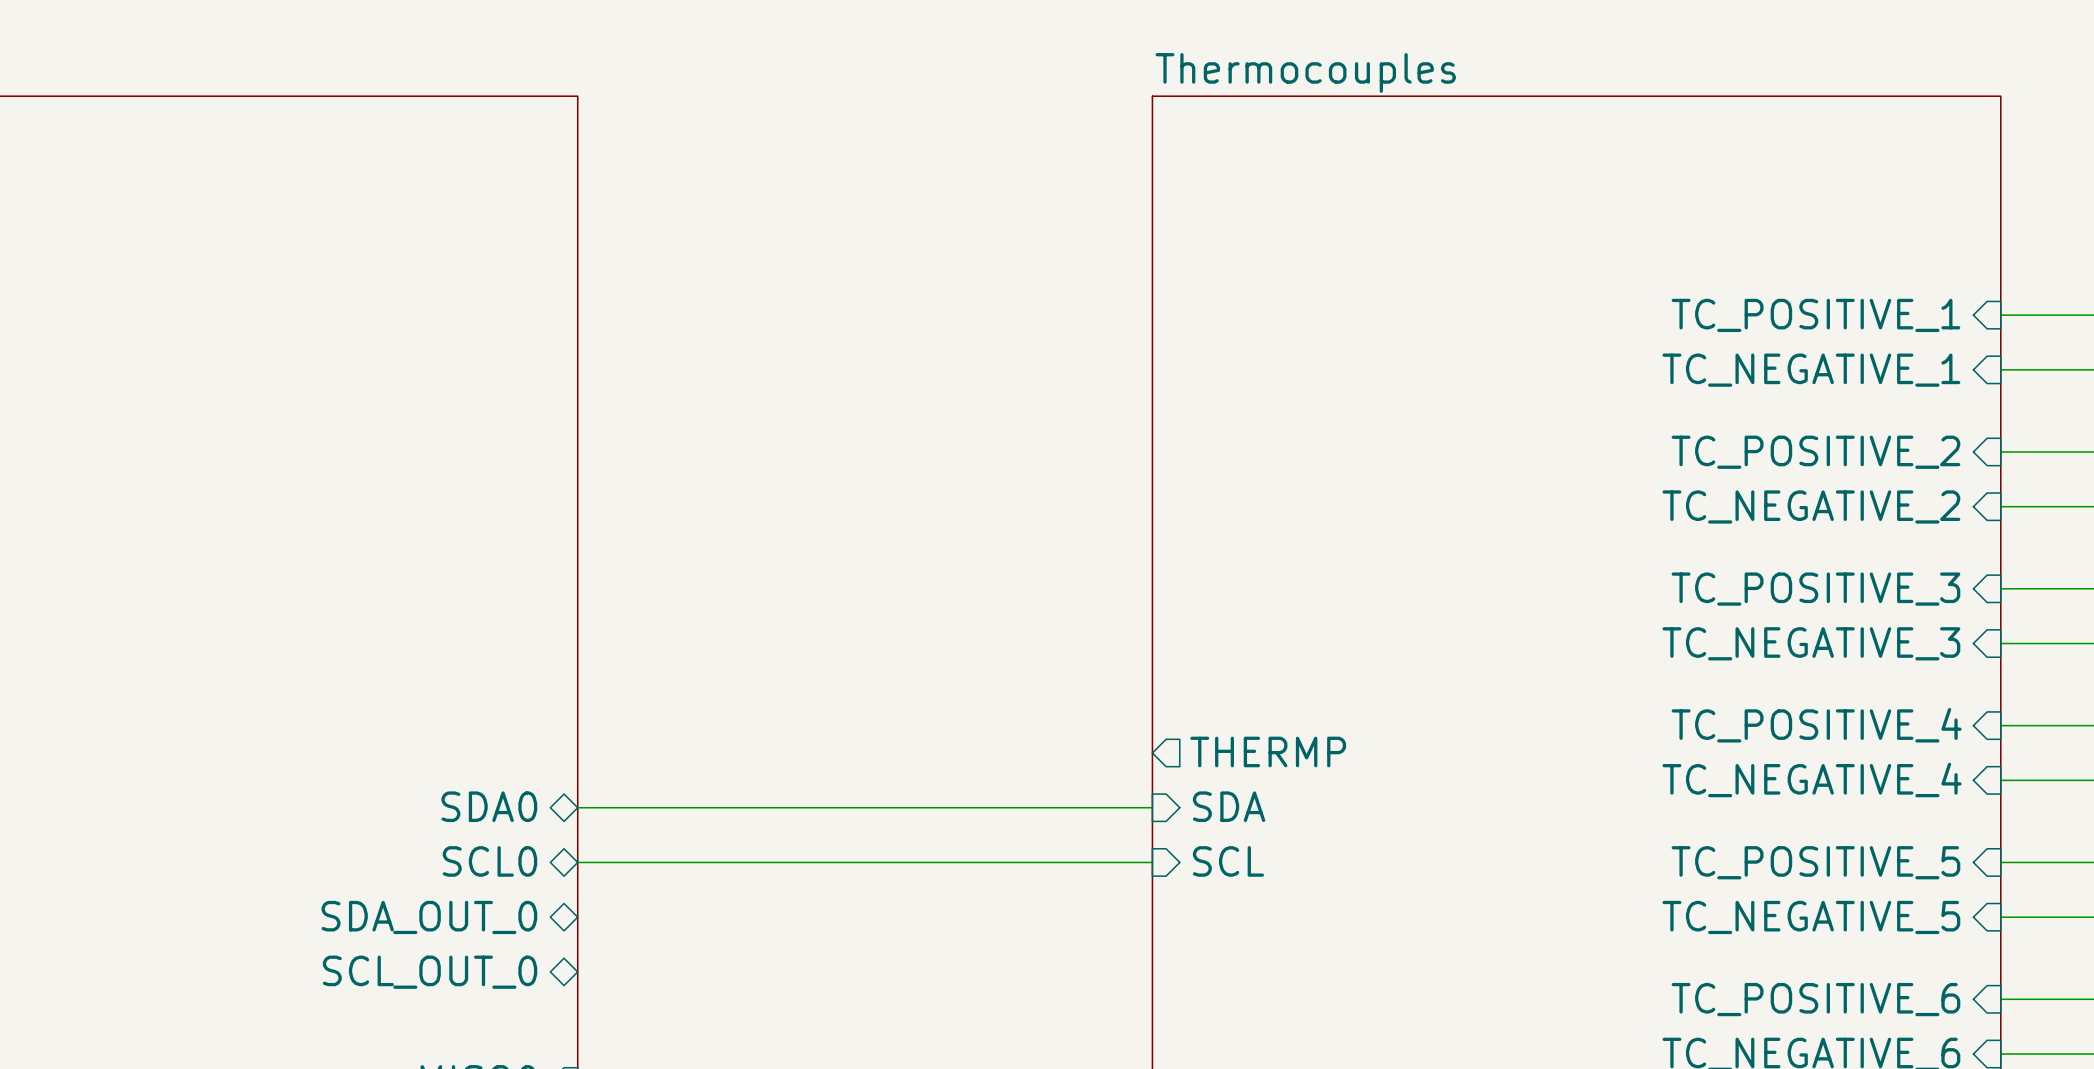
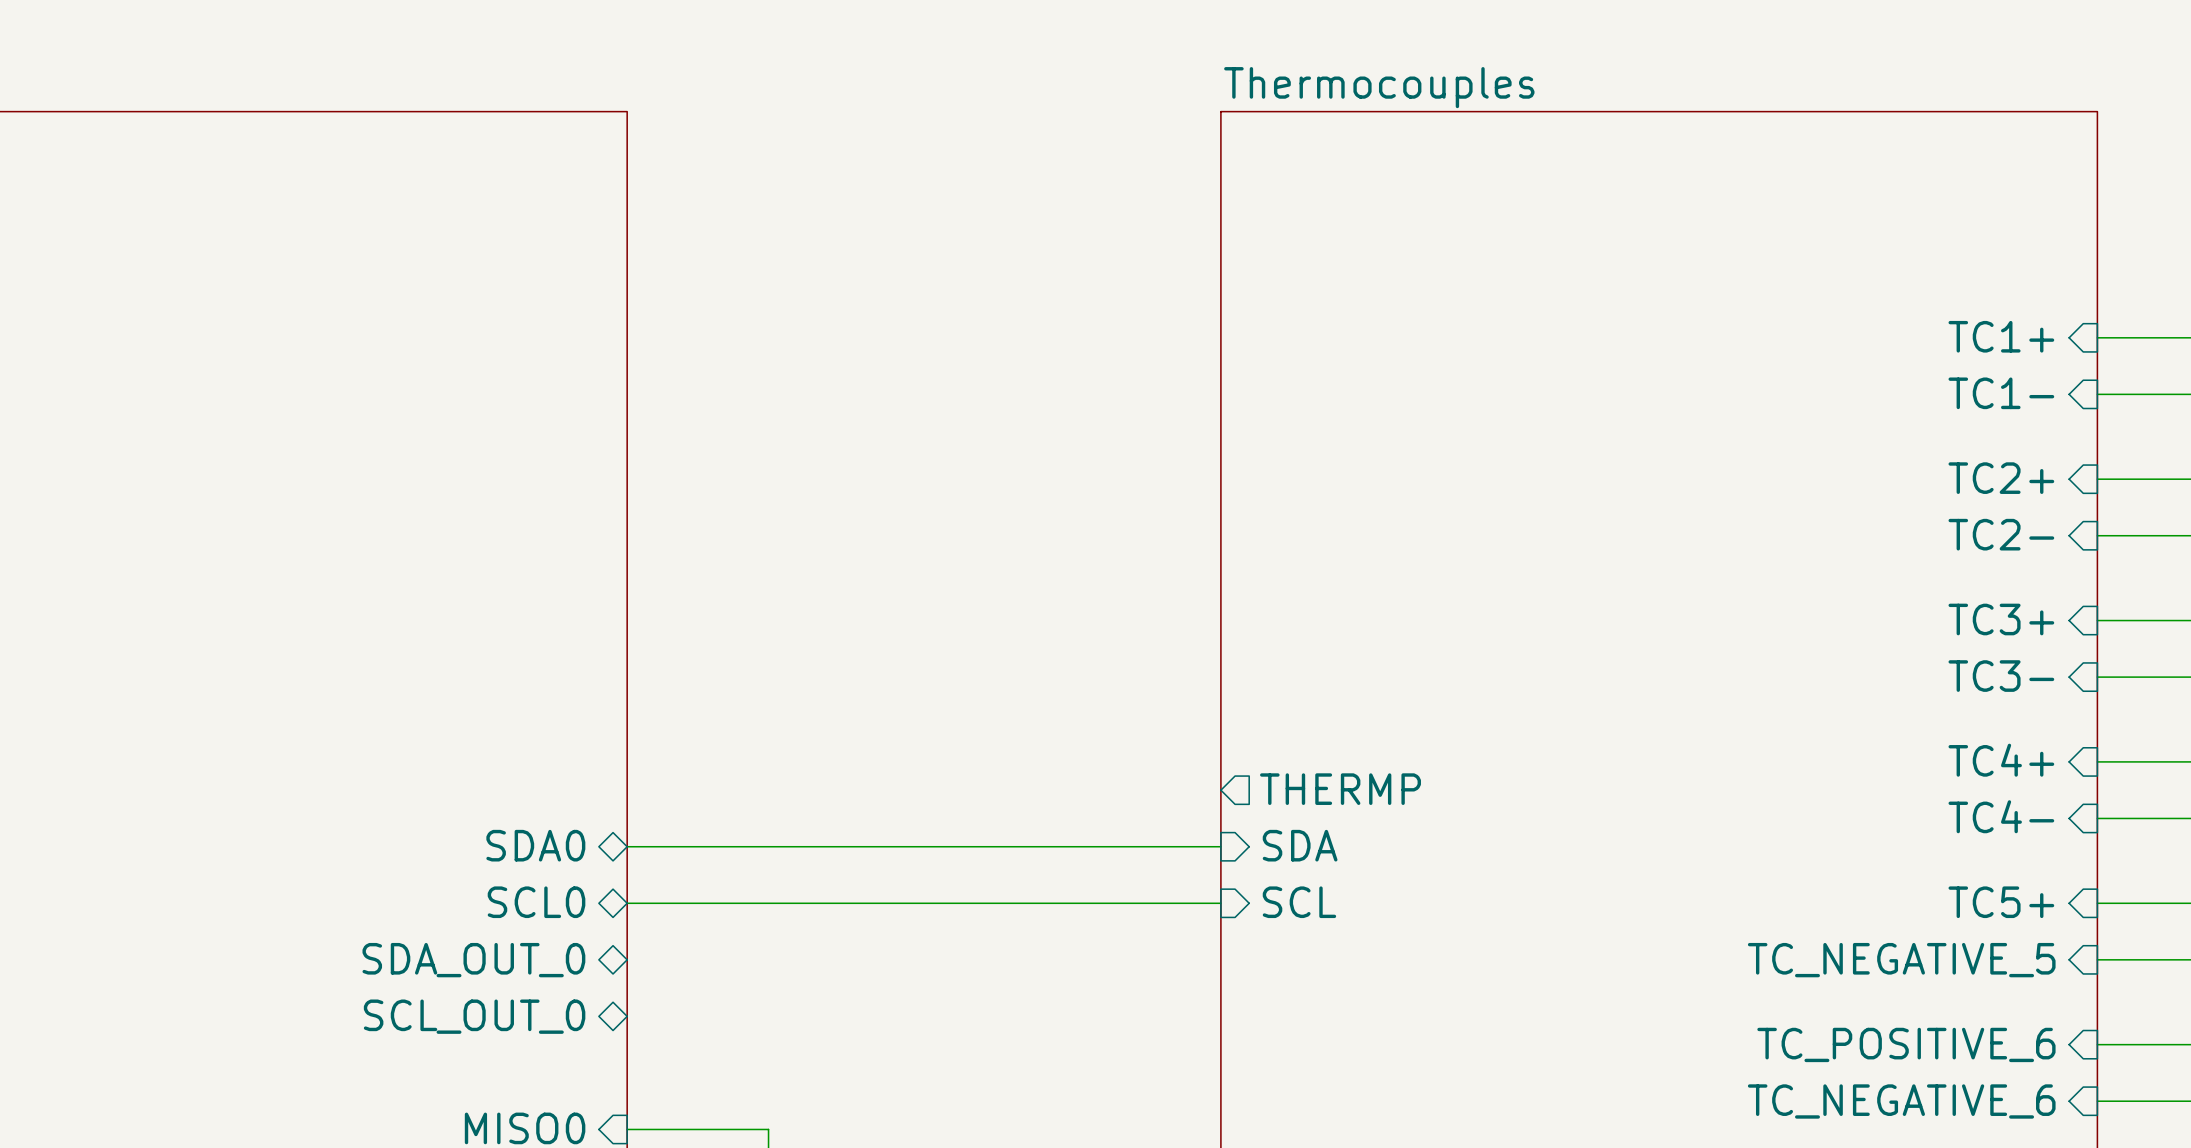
sheet pin: TC_POSITIVE_1 (1815, 315) -> TC1+ (2001, 336)
sheet pin: TC_NEGATIVE_1 (1811, 370) -> TC1- (2001, 393)
sheet pin: TC_POSITIVE_2 (1815, 452) -> TC2+ (2001, 478)
sheet pin: TC_NEGATIVE_2 (1811, 506) -> TC2- (2001, 534)
sheet pin: TC_POSITIVE_3 (1815, 589) -> TC3+ (2001, 619)
sheet pin: TC_NEGATIVE_3 (1811, 643) -> TC3- (2001, 676)
sheet pin: TC_POSITIVE_4 (1816, 725) -> TC4+ (2001, 760)
sheet pin: TC_NEGATIVE_4 (1812, 779) -> TC4- (2001, 816)
sheet pin: TC_POSITIVE_5 (1815, 862) -> TC5+ (2001, 902)

